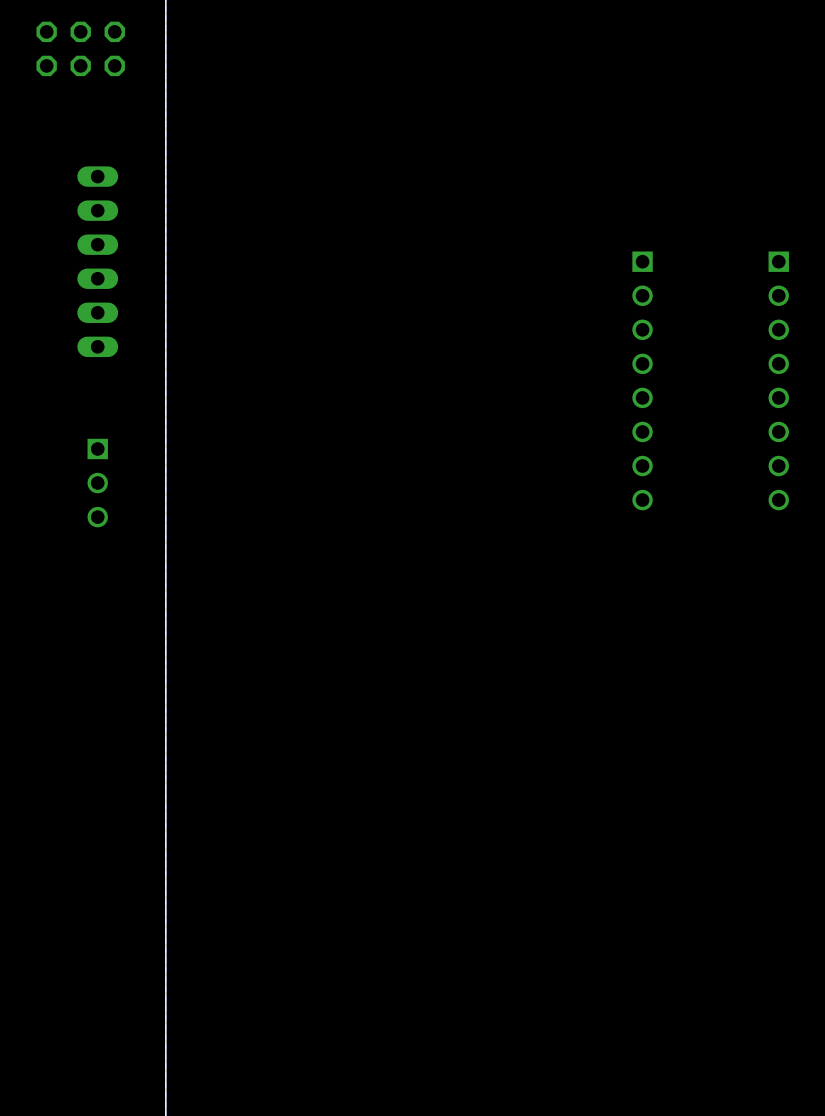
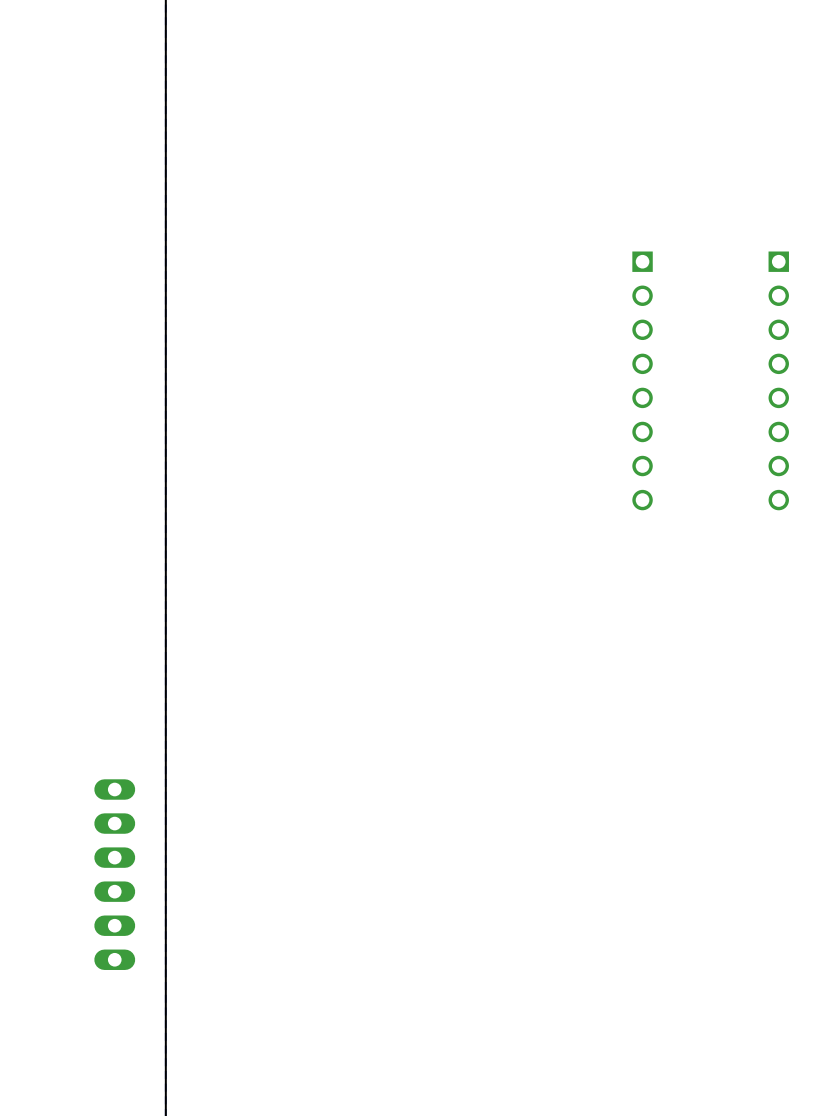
part: (80, 48) -> none
part: (97, 261) -> none
part: (97, 483) -> none
part: none -> (114, 874)

